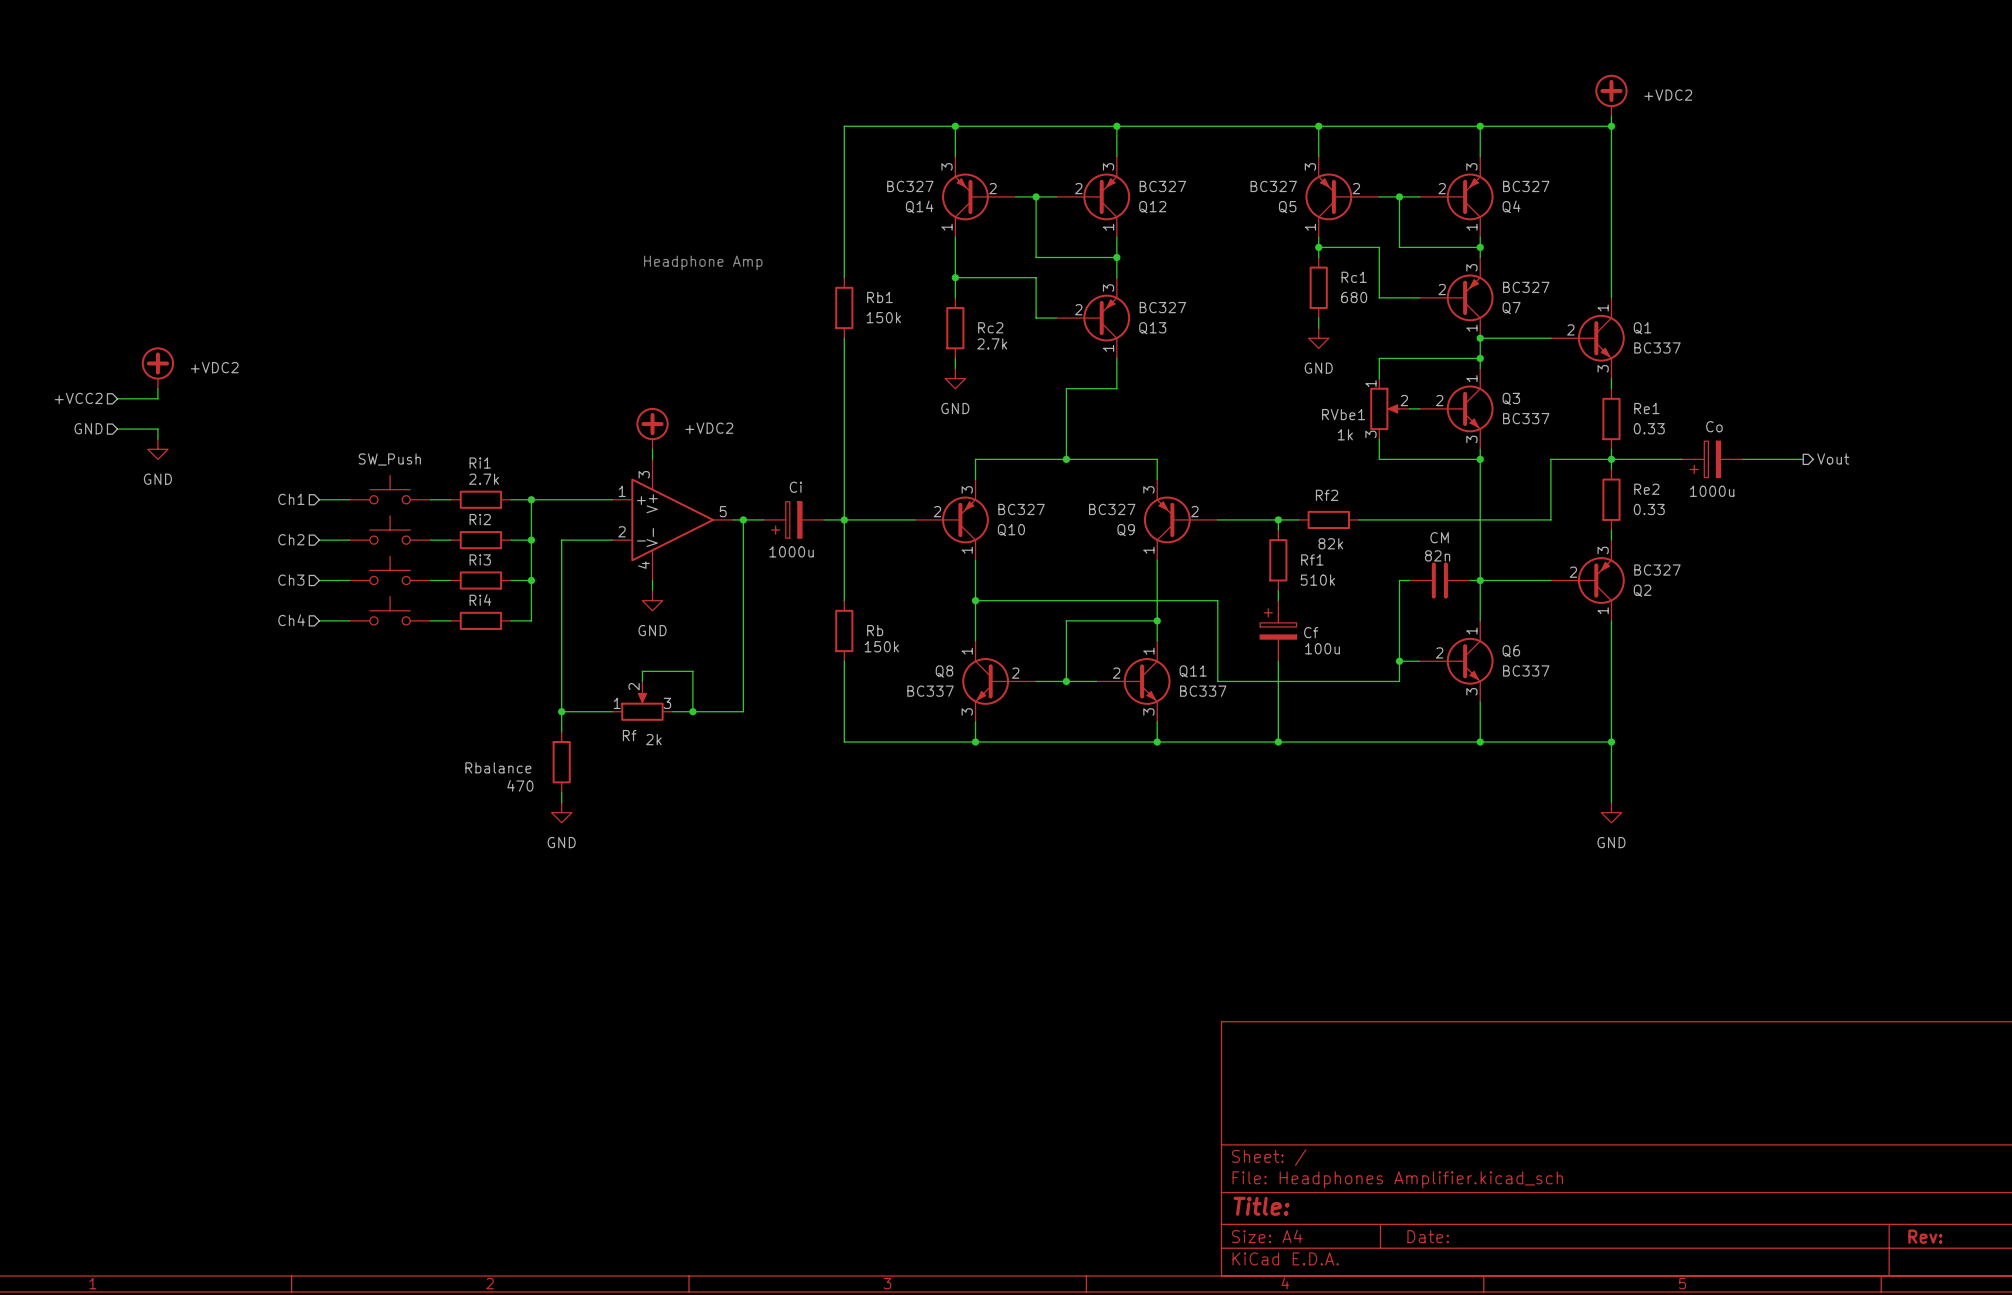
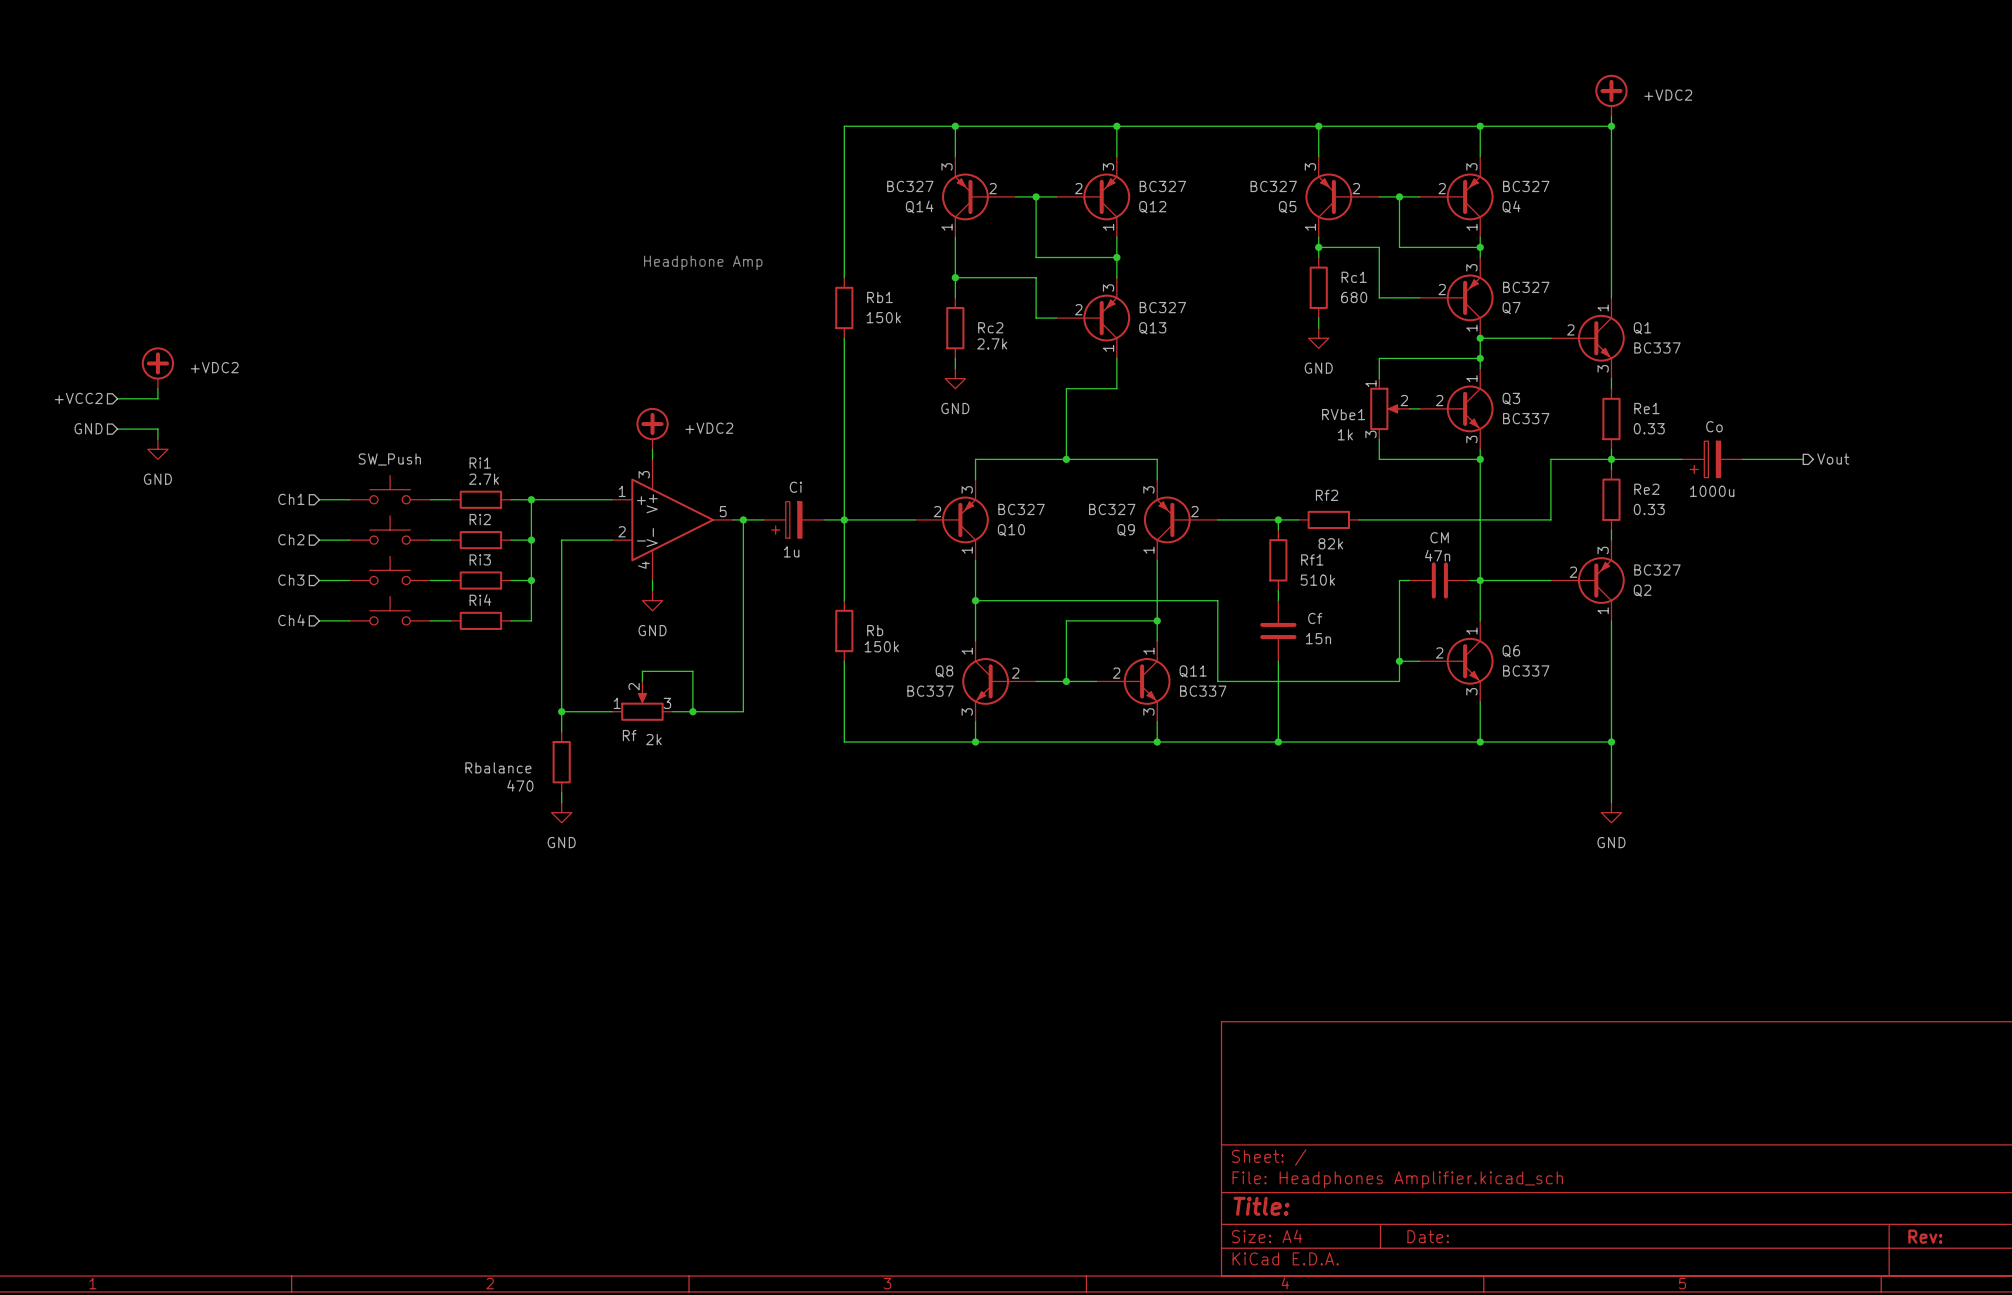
Ci value: 1000u (791, 551) -> 1u (791, 551)
CM value: 82n (1437, 555) -> 47n (1437, 555)
Cf symbol: [1260, 600, 1297, 662] -> [1260, 600, 1297, 662]
Cf value: 100u (1322, 648) -> 15n (1318, 638)

